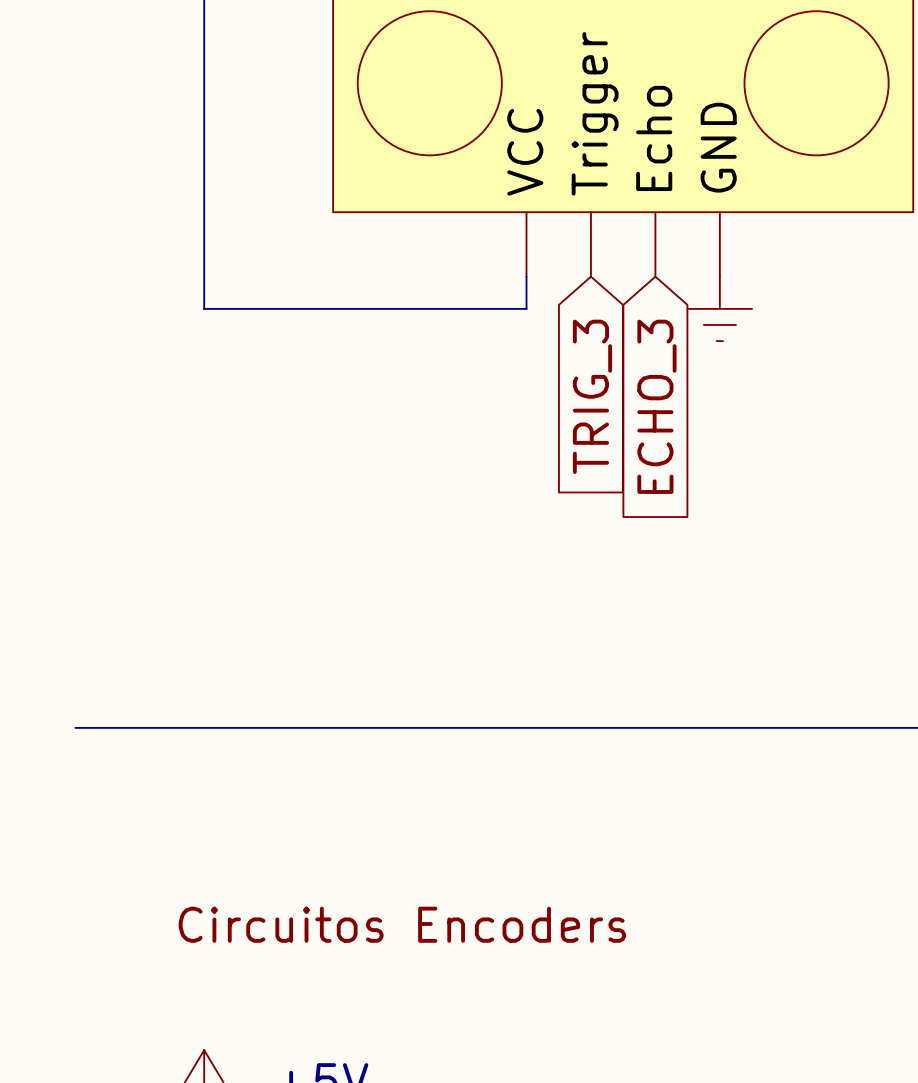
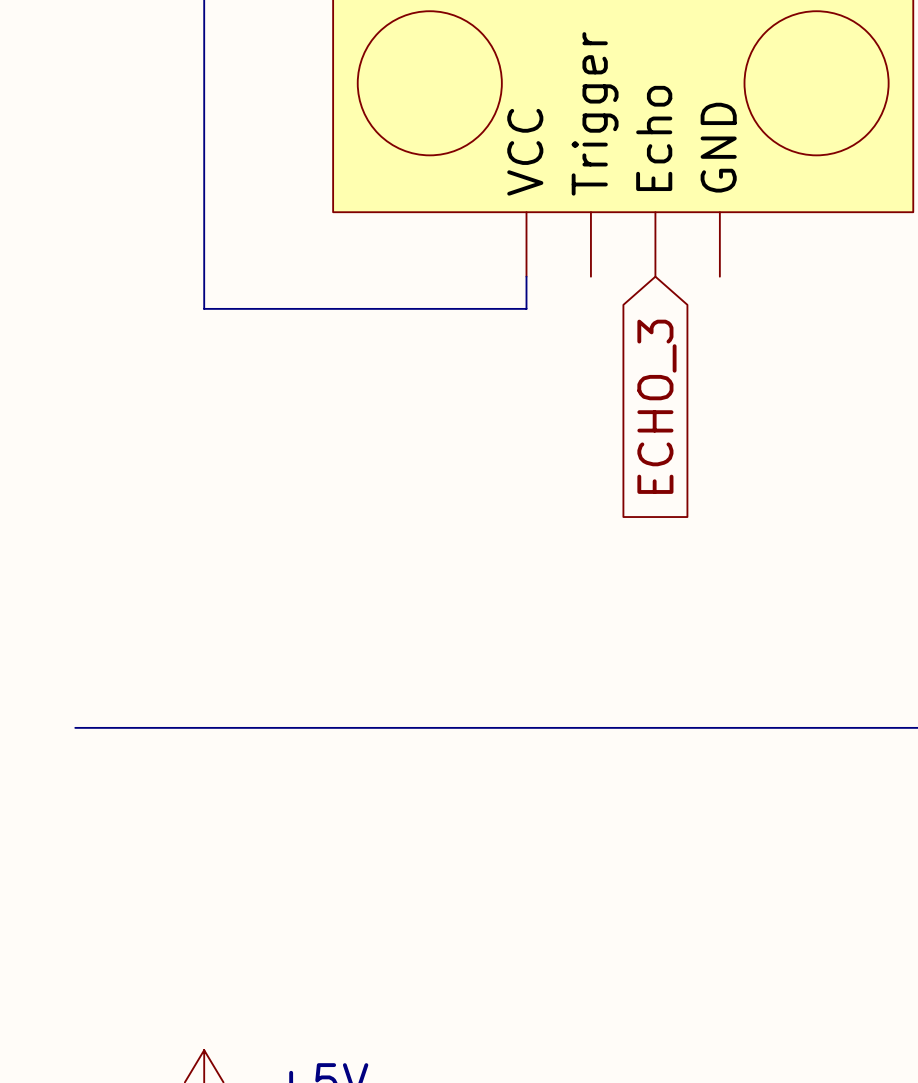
power symbol: (719, 308) -> none
global label: TRIG_3 (592, 396) -> none
label: Circuitos Encoders (402, 924) -> none

